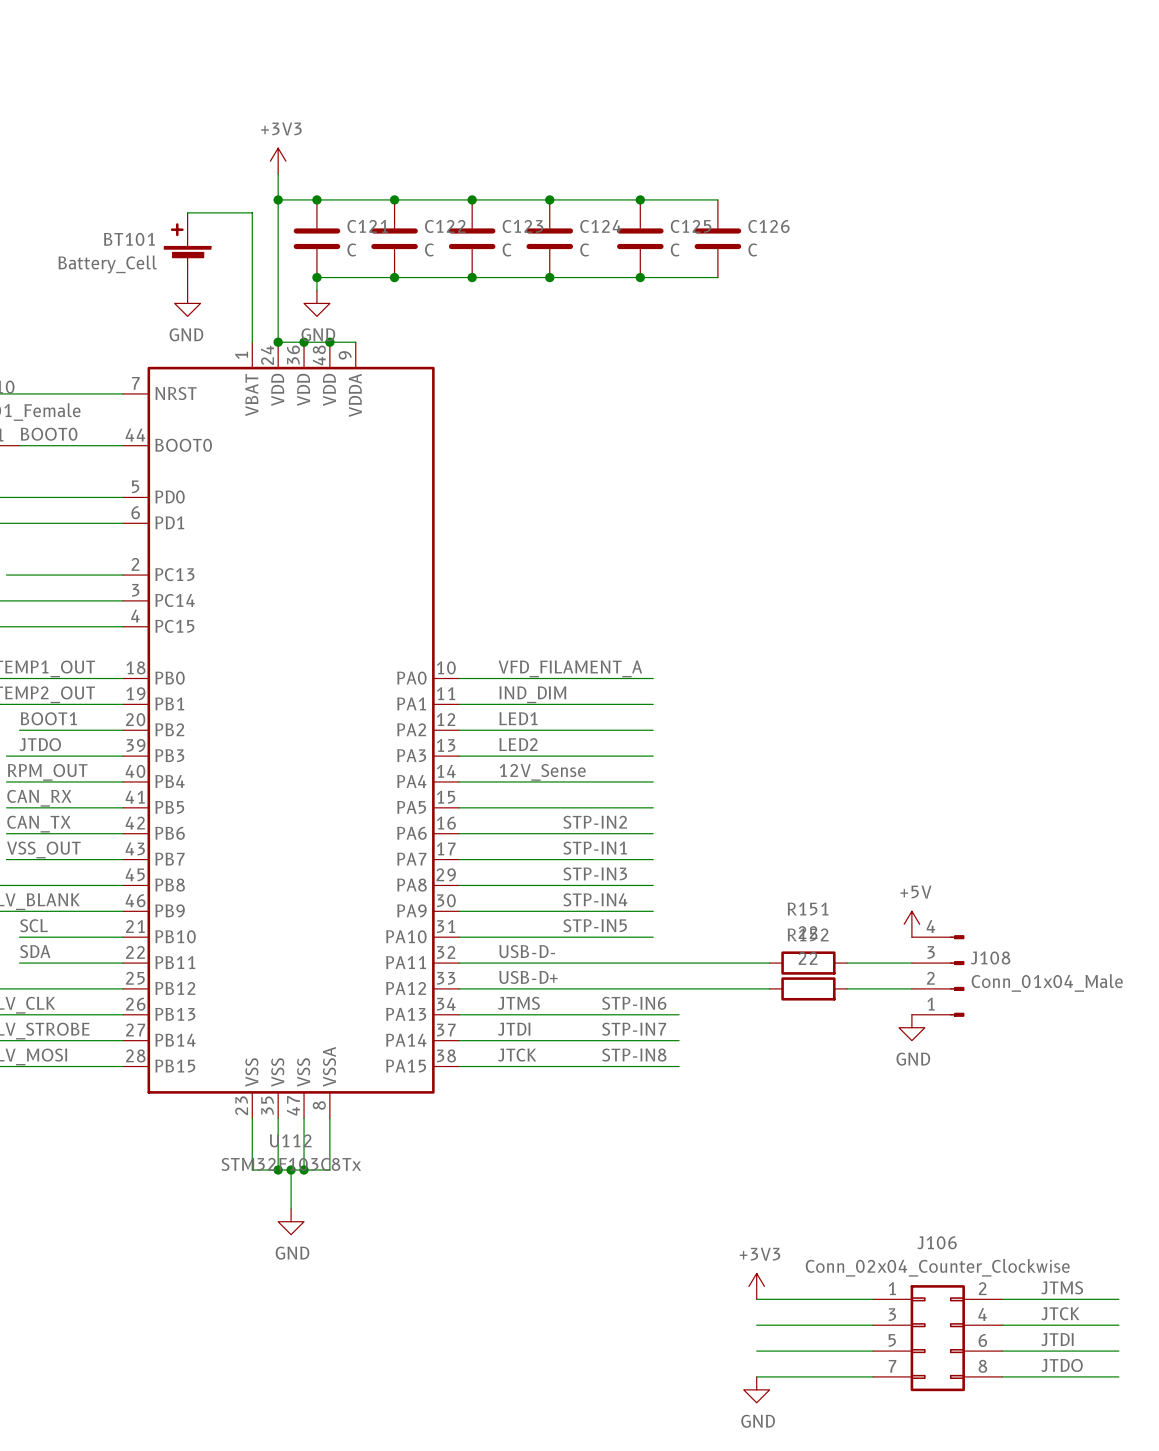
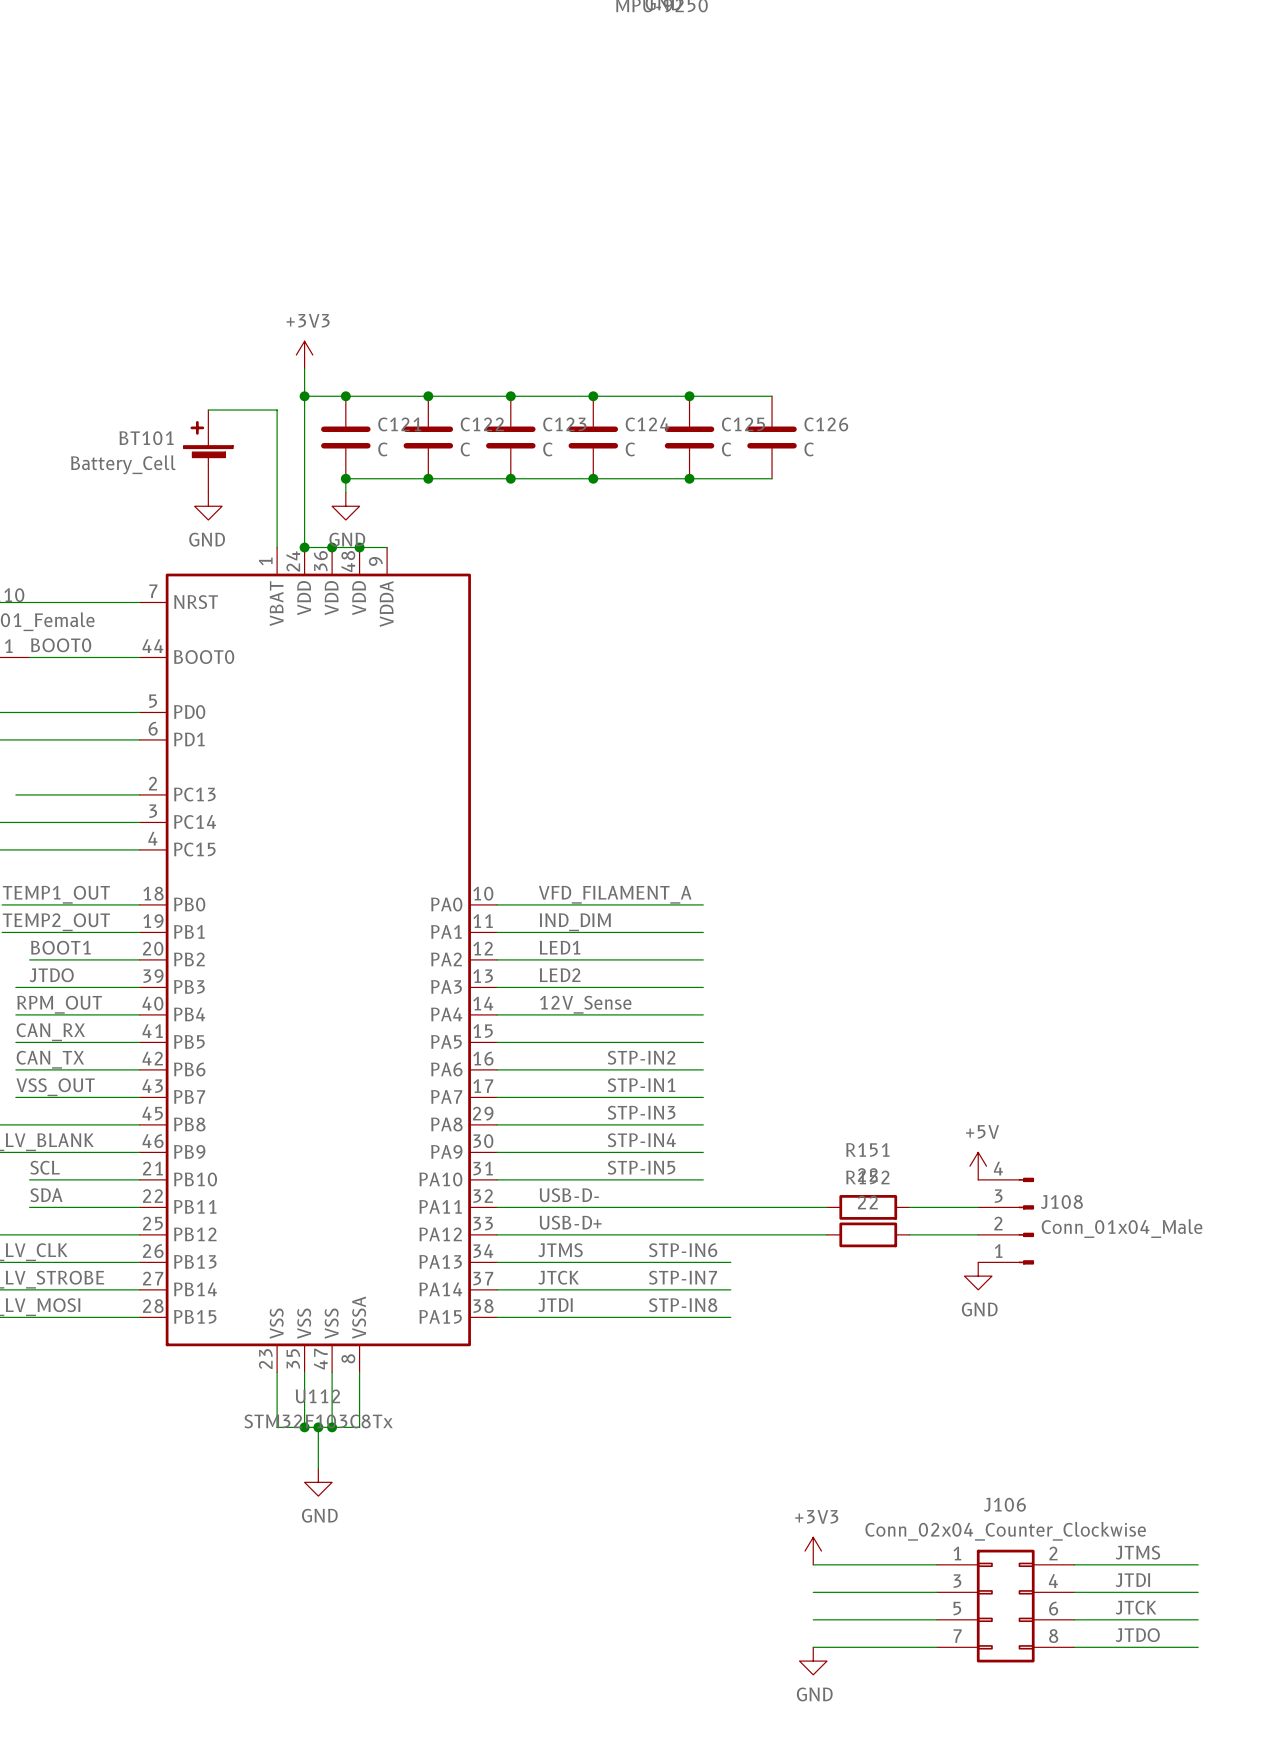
label: JTDI (514, 1029) -> JTCK (558, 1277)
label: JTCK (517, 1055) -> JTDI (555, 1305)
label: JTCK (1060, 1313) -> JTDI (1132, 1580)
label: JTDI (1057, 1339) -> JTCK (1136, 1607)

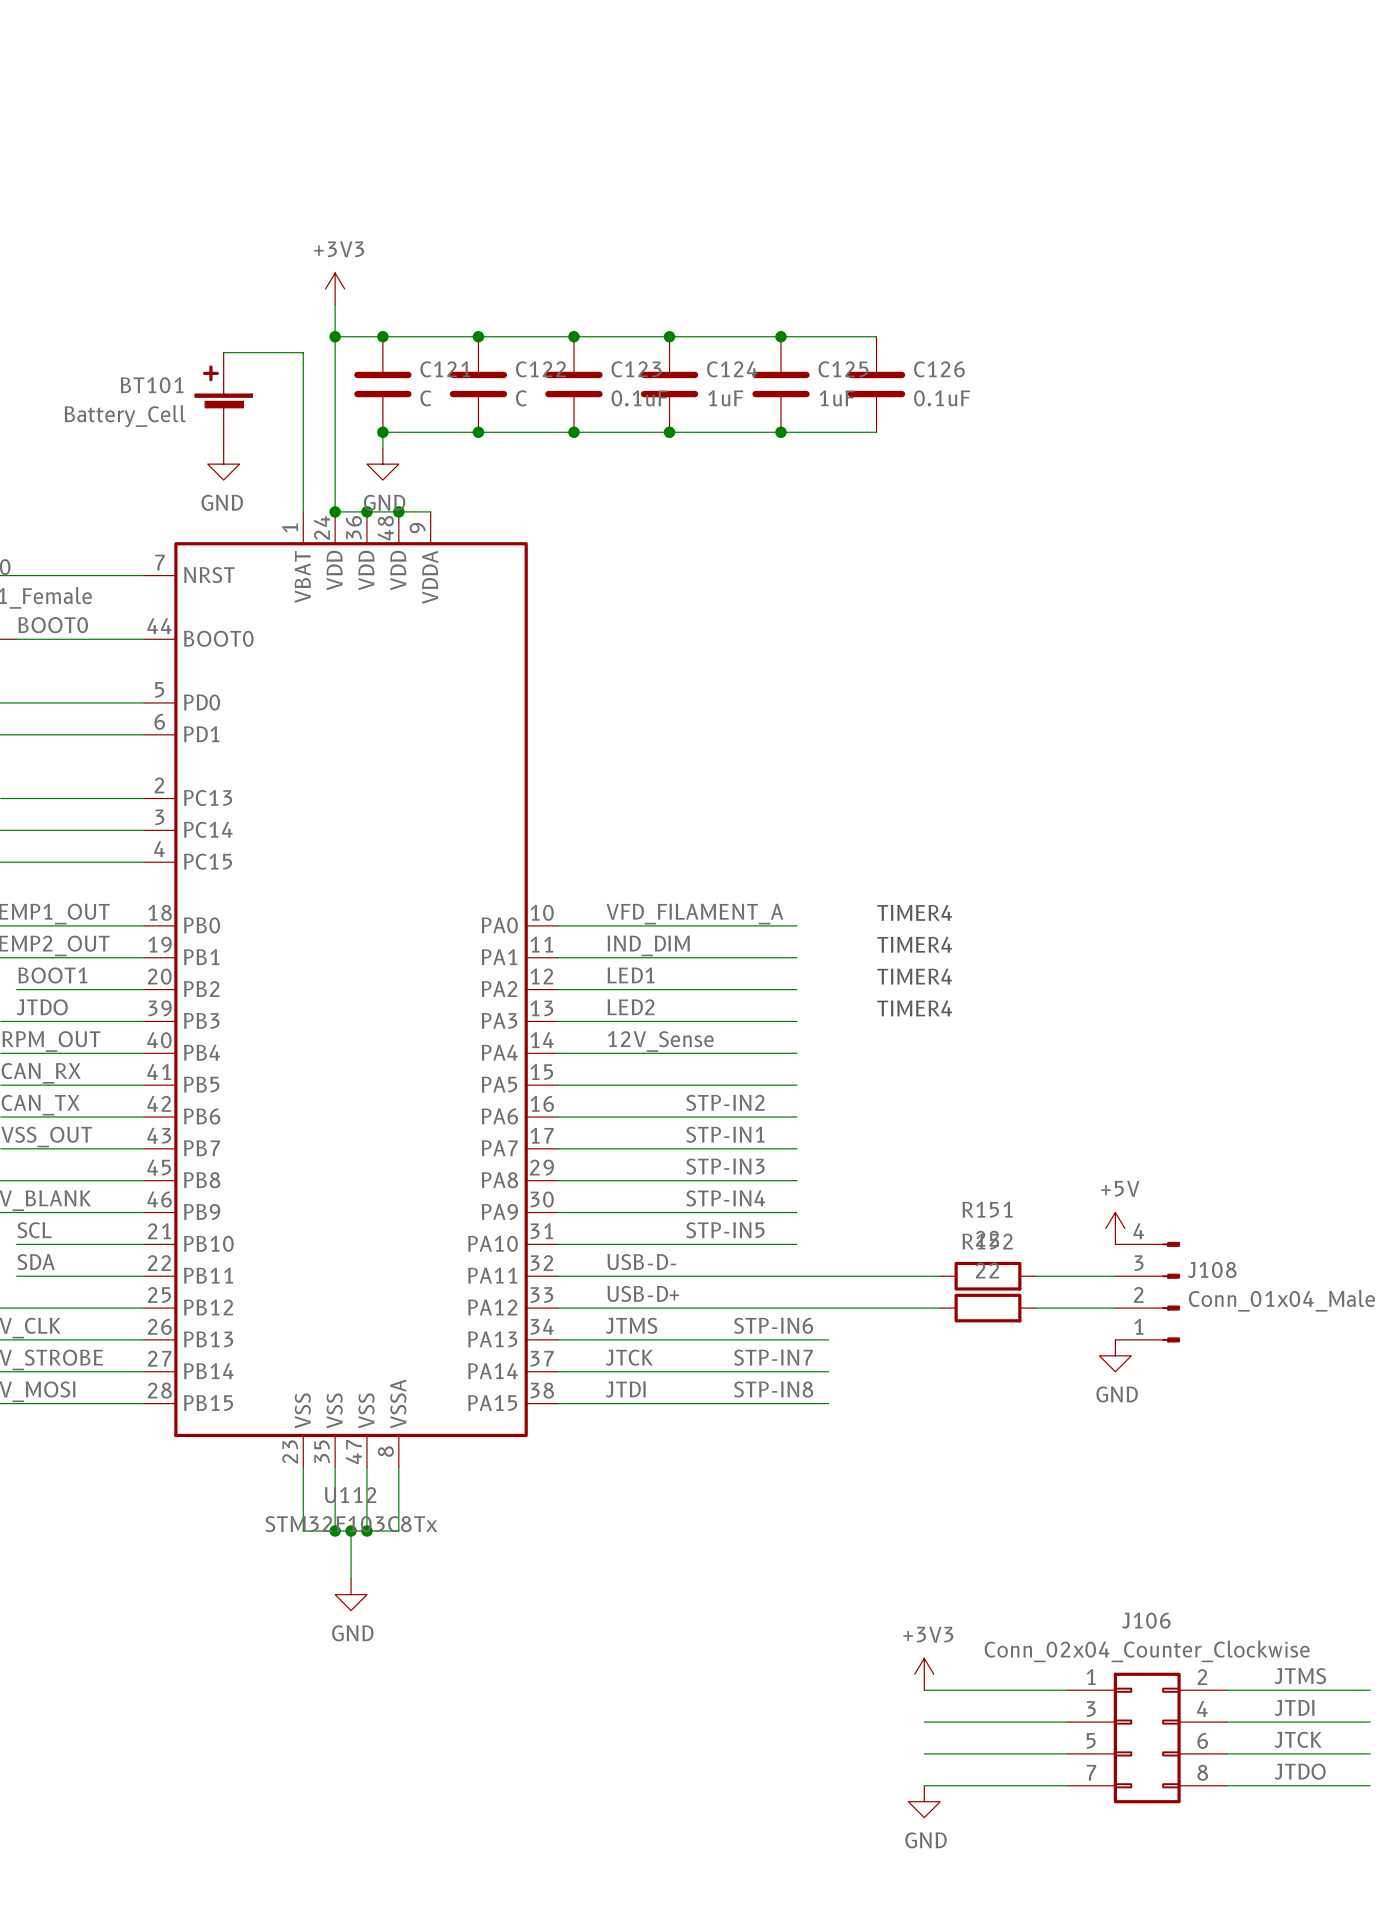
C123 value: C (547, 449) -> 0.1uF (639, 398)
C124 value: C (630, 449) -> 1uF (725, 398)
C125 value: C (726, 449) -> 1uF (837, 398)
C126 value: C (809, 449) -> 0.1uF (942, 398)
text: none -> TIMER4 (914, 912)
text: none -> TIMER4 (914, 944)
text: none -> TIMER4 (914, 976)
text: none -> TIMER4 (914, 1008)

